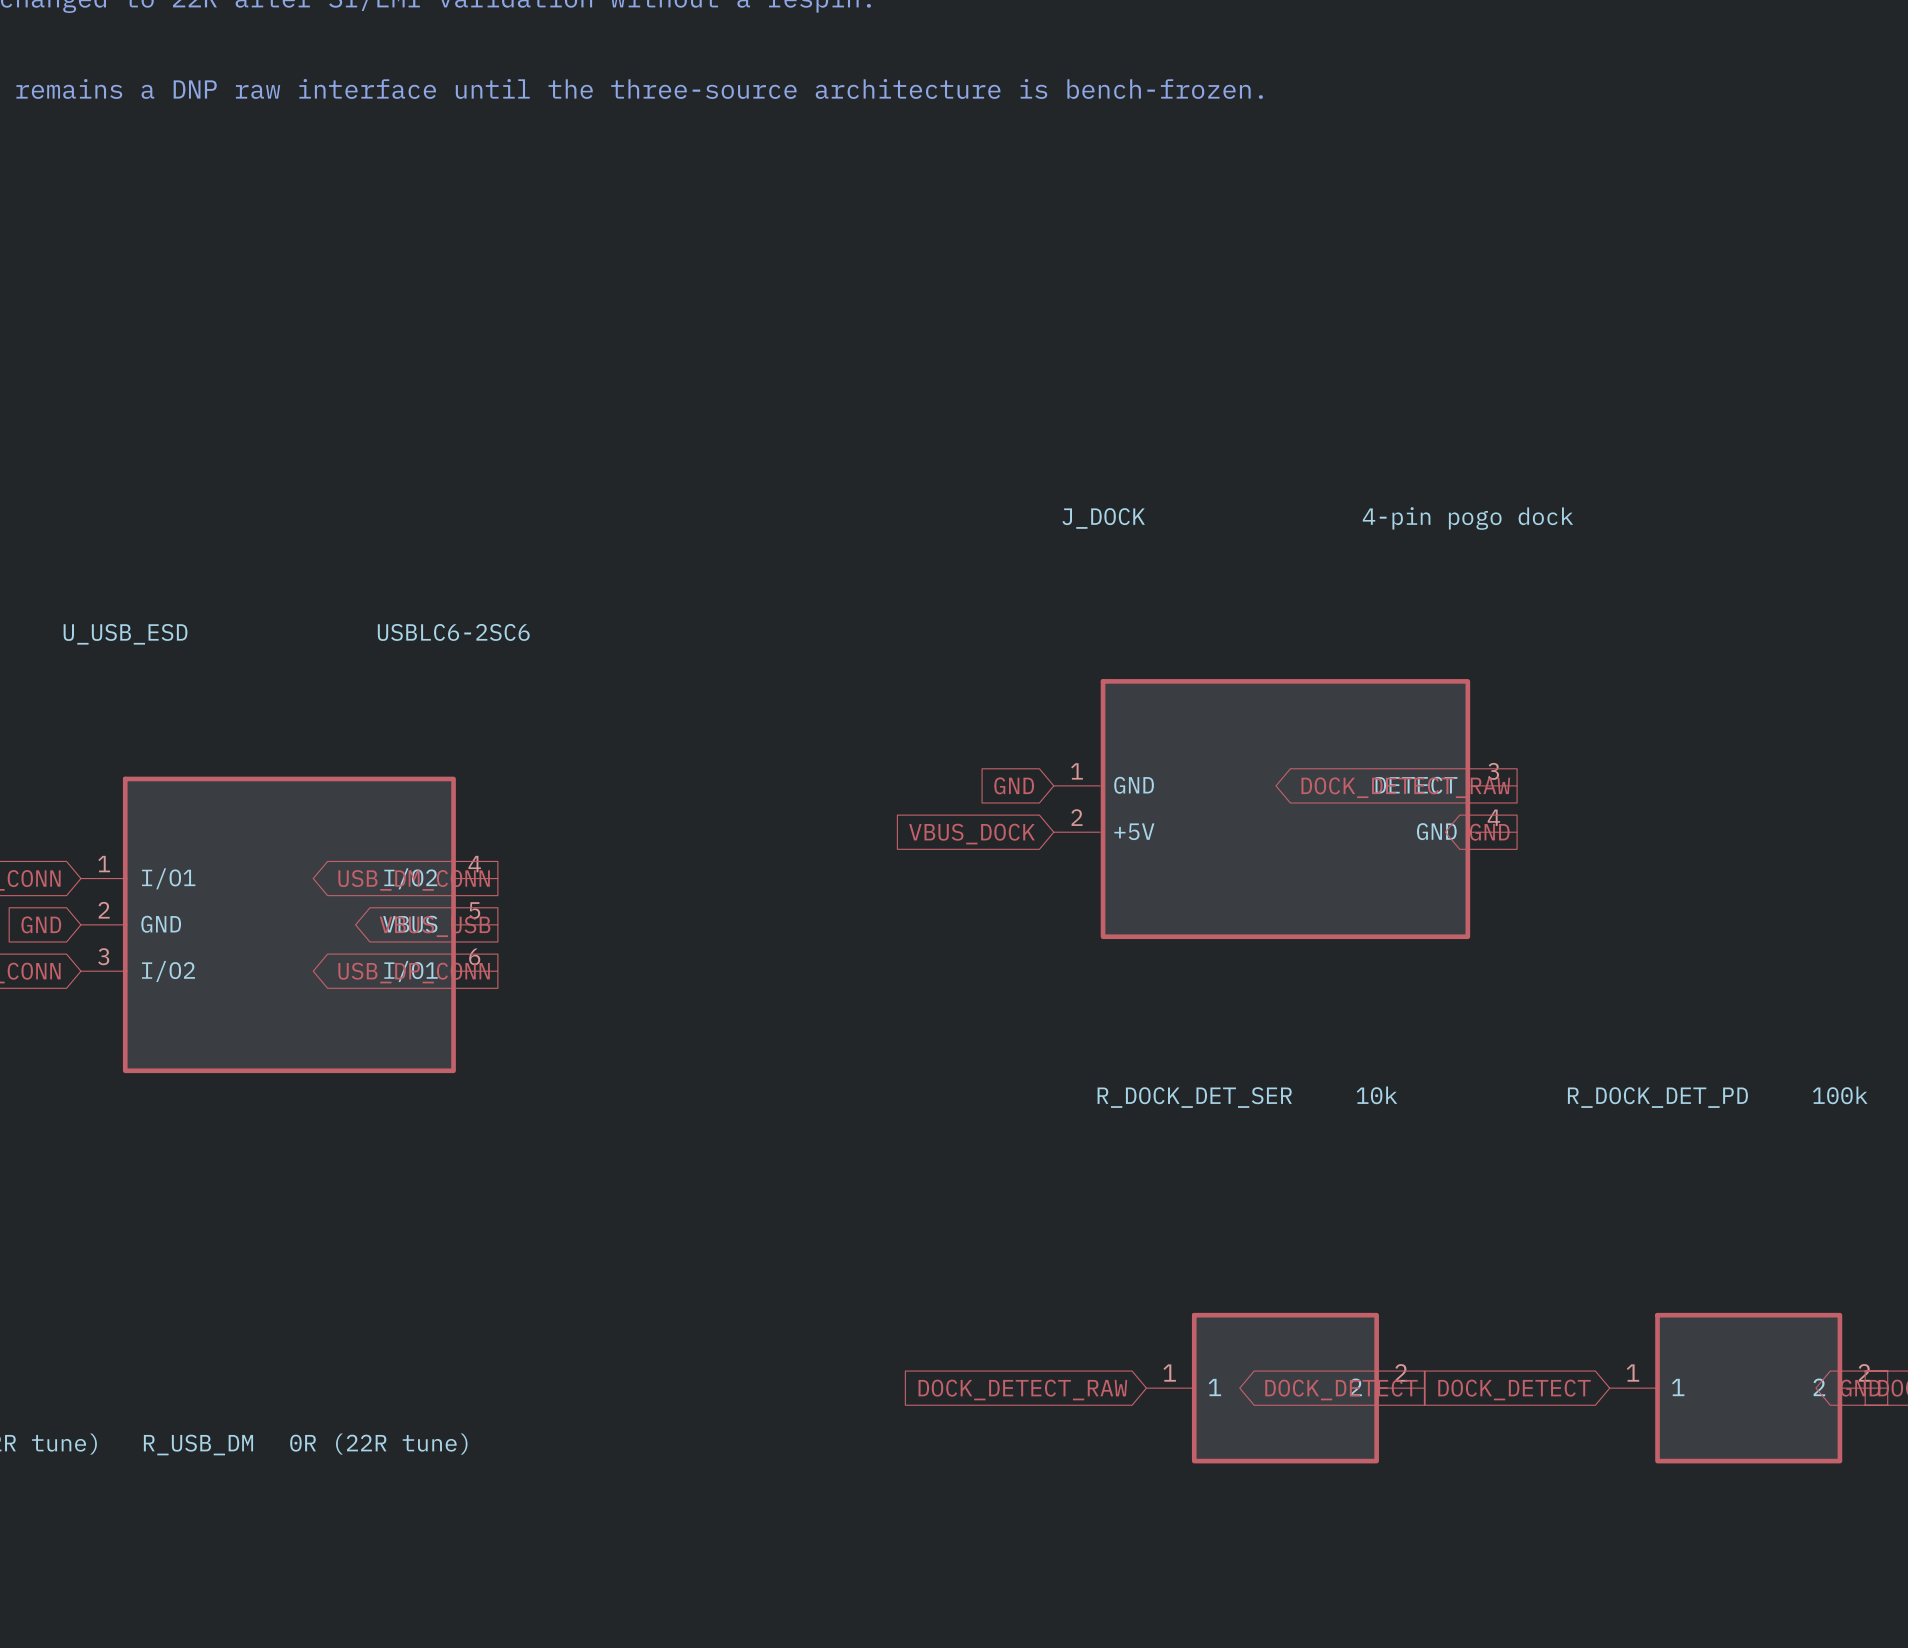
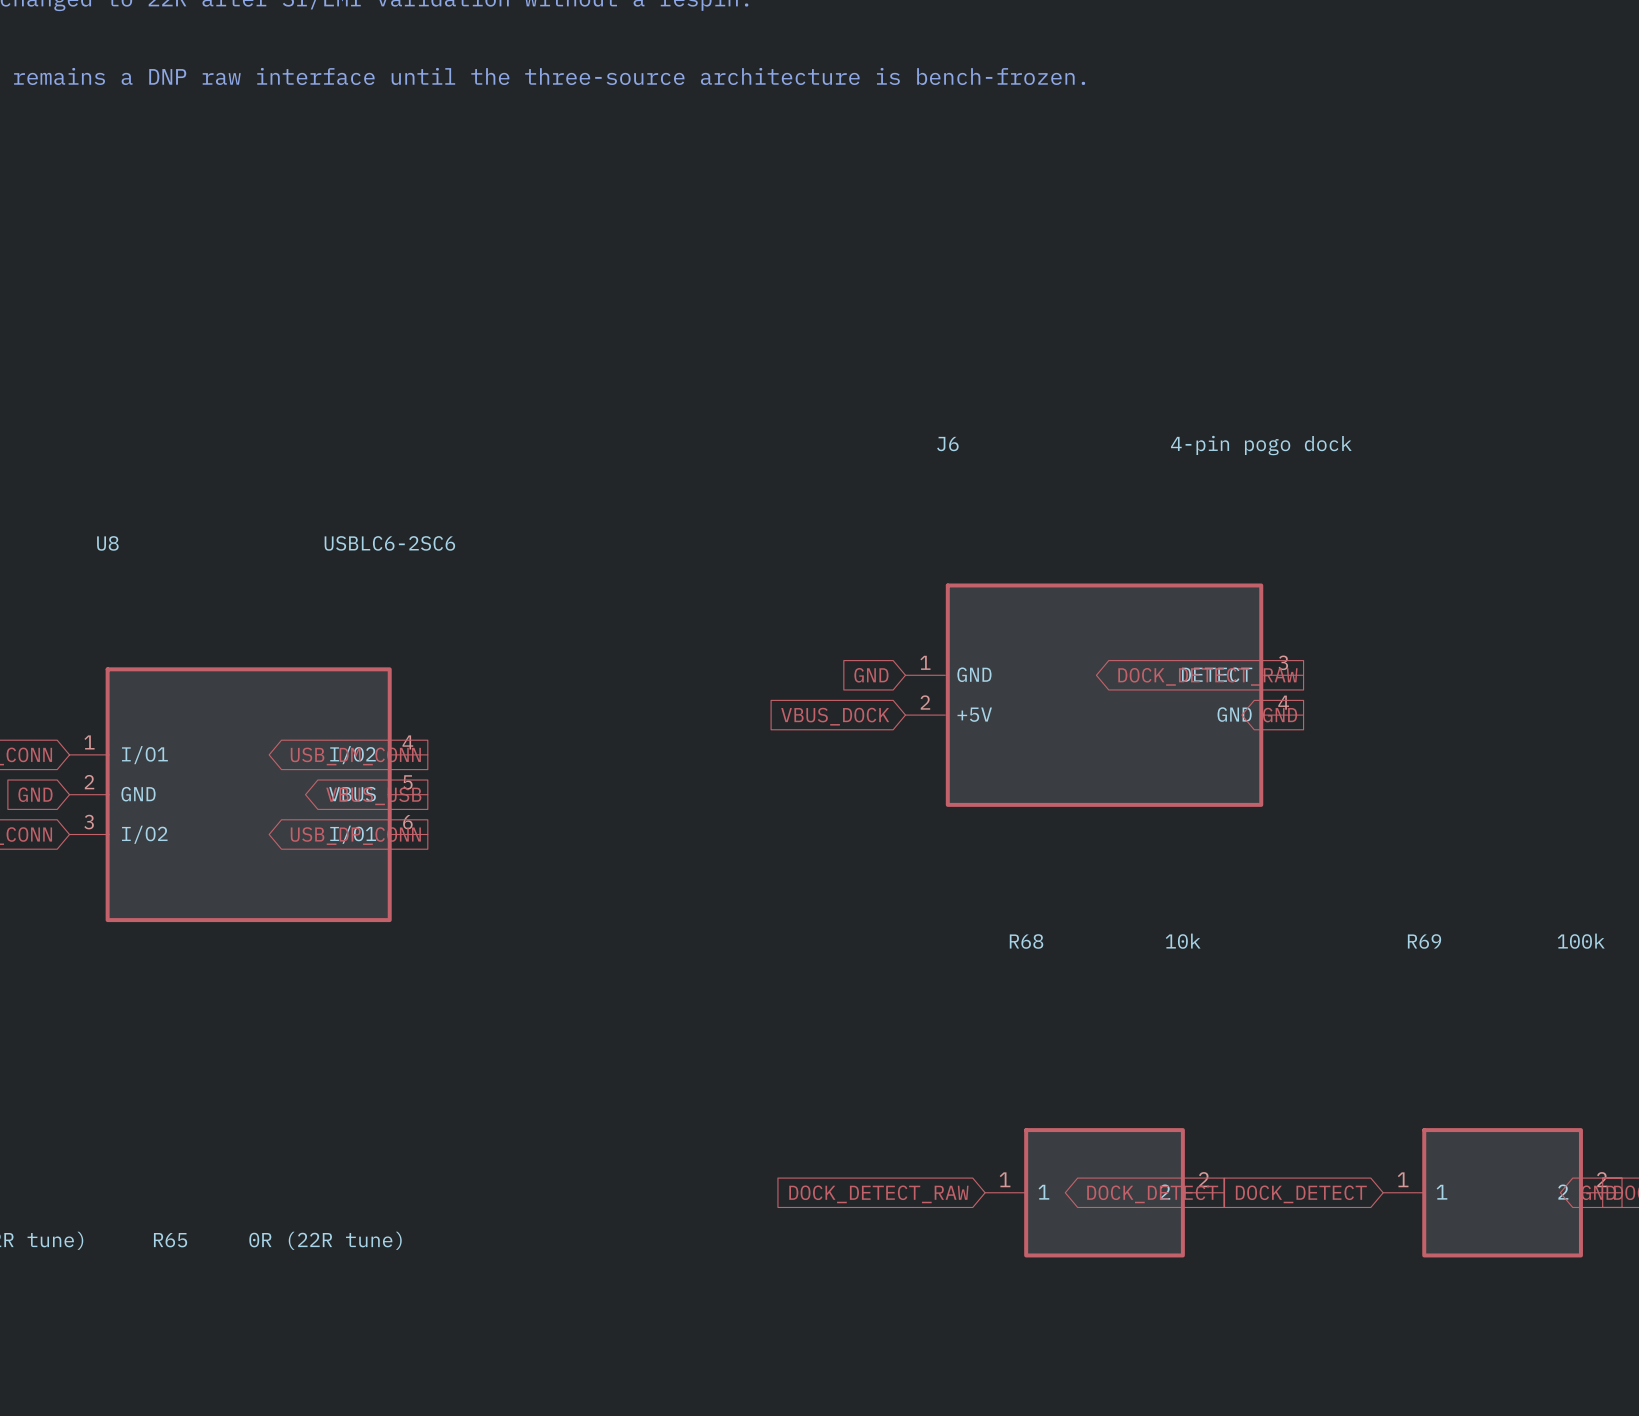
J_DOCK name: J_DOCK (1103, 518) -> J6 (947, 444)
U_USB_ESD name: U_USB_ESD (125, 634) -> U8 (107, 543)
R_DOCK_DET_SER name: R_DOCK_DET_SER (1194, 1097) -> R68 (1026, 941)
R_DOCK_DET_PD name: R_DOCK_DET_PD (1657, 1097) -> R69 (1424, 941)
R_USB_DM name: R_USB_DM (198, 1445) -> R65 (170, 1240)

